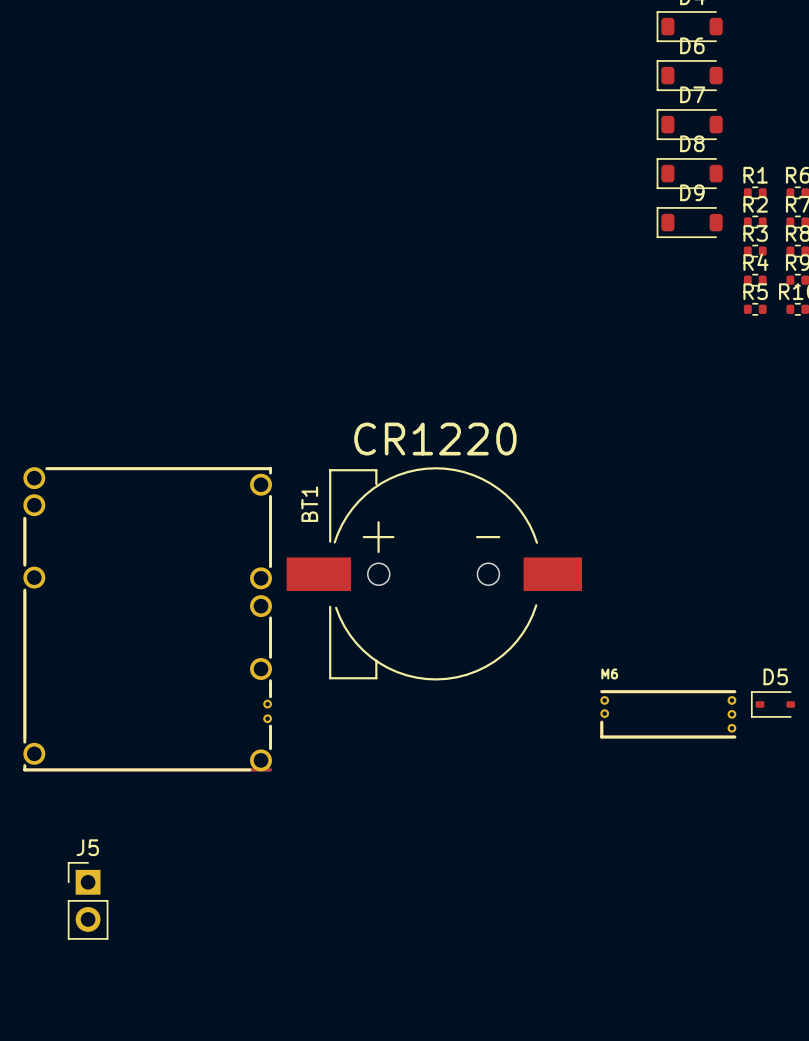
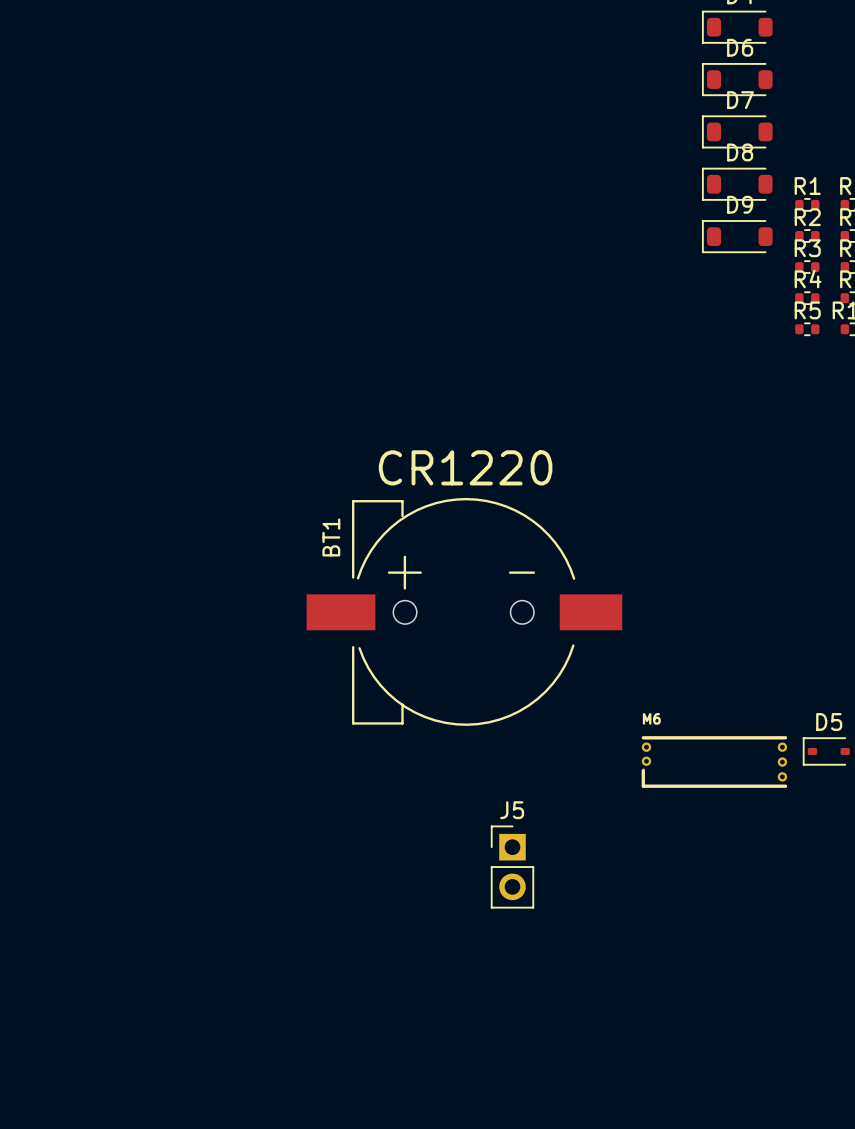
part: (147, 619) -> none
J5 position: (88, 900) -> (512, 867)

